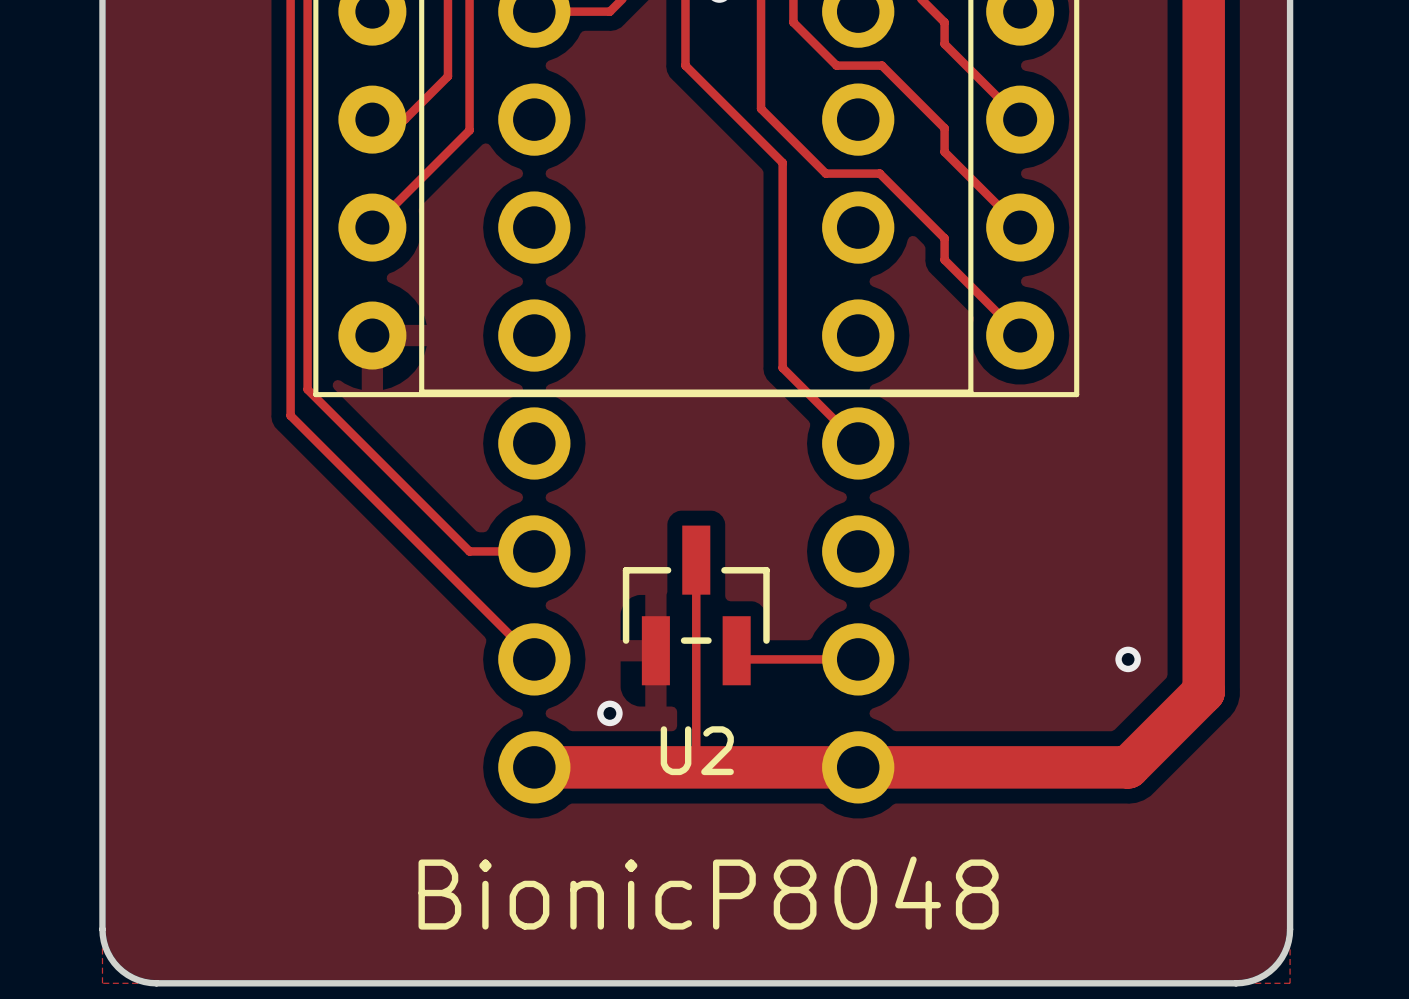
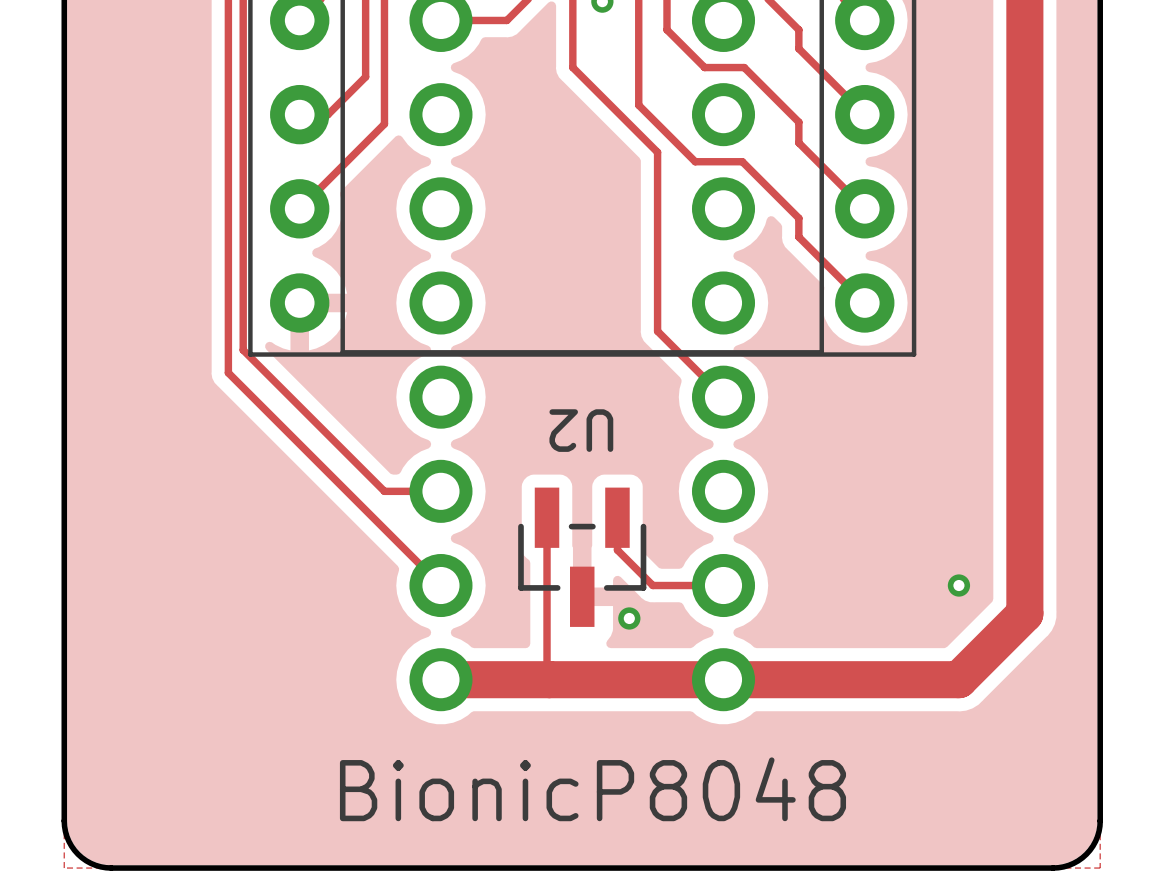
track: (696, 560) (696, 767) -> none
track: none -> (547, 517) (547, 677) (549, 679)
U2 rotation: 0° (696, 605) -> 180° (582, 557)
track: (736, 650) (745, 659) (777, 659) -> (617, 517) (617, 550) (652, 585)
via position: (609, 713) -> (629, 618)

